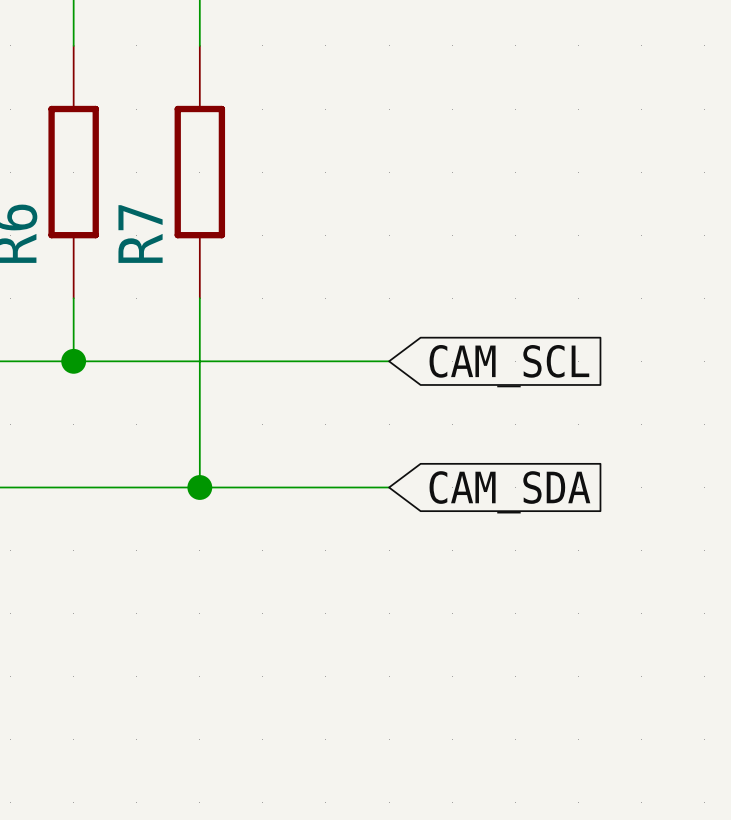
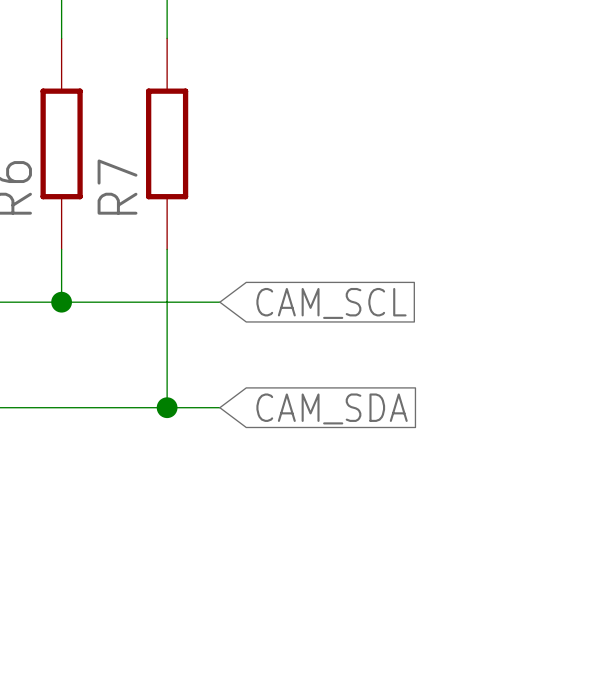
wire: (262, 361) (389, 361) -> none
global label position: CAM_SCL (509, 366) -> CAM_SCL (331, 303)
wire: (262, 487) (389, 487) -> none
global label position: CAM_SDA (509, 492) -> CAM_SDA (332, 408)

